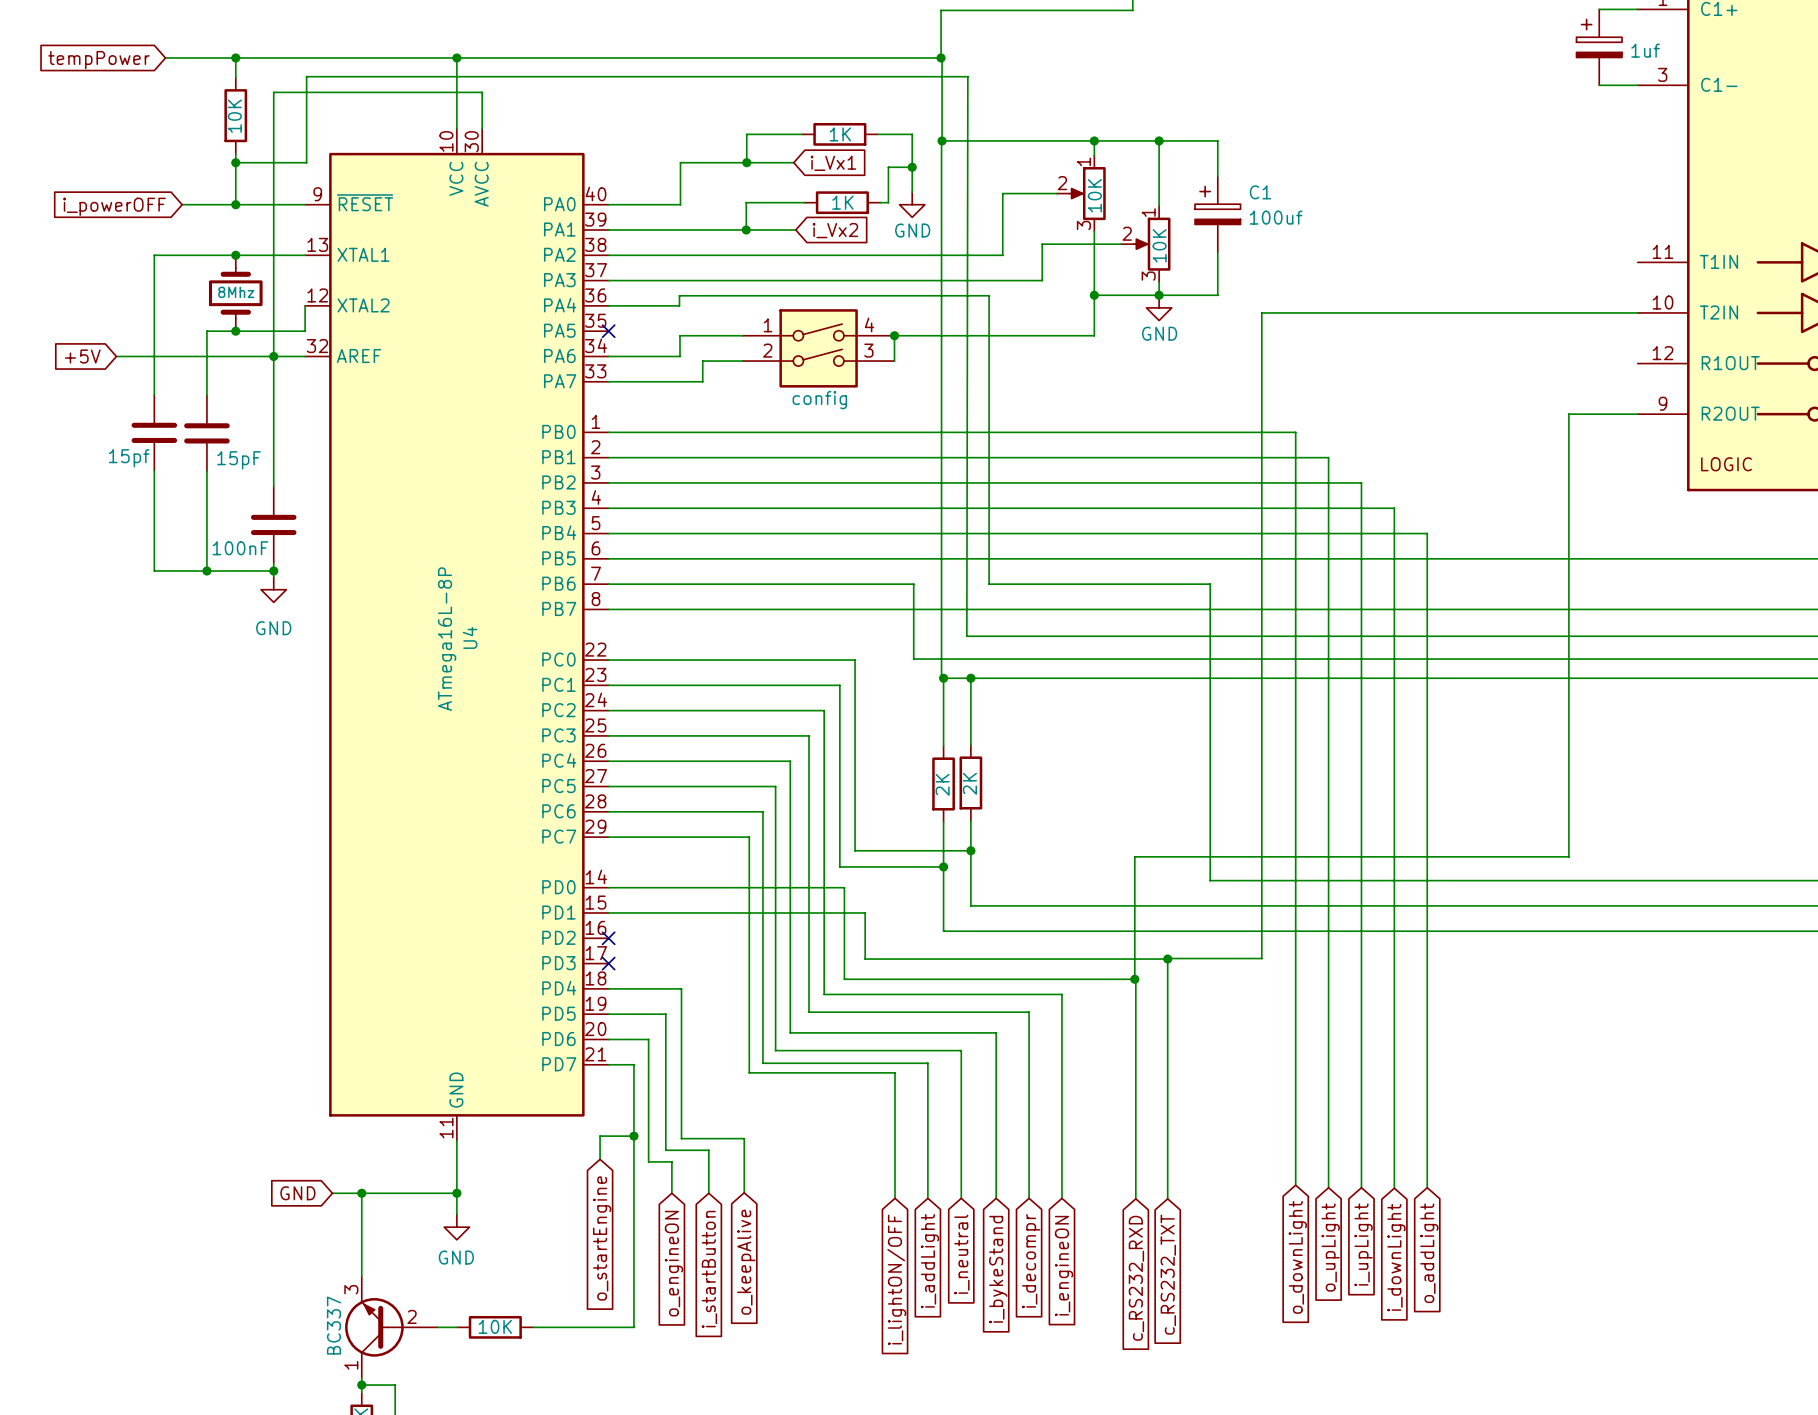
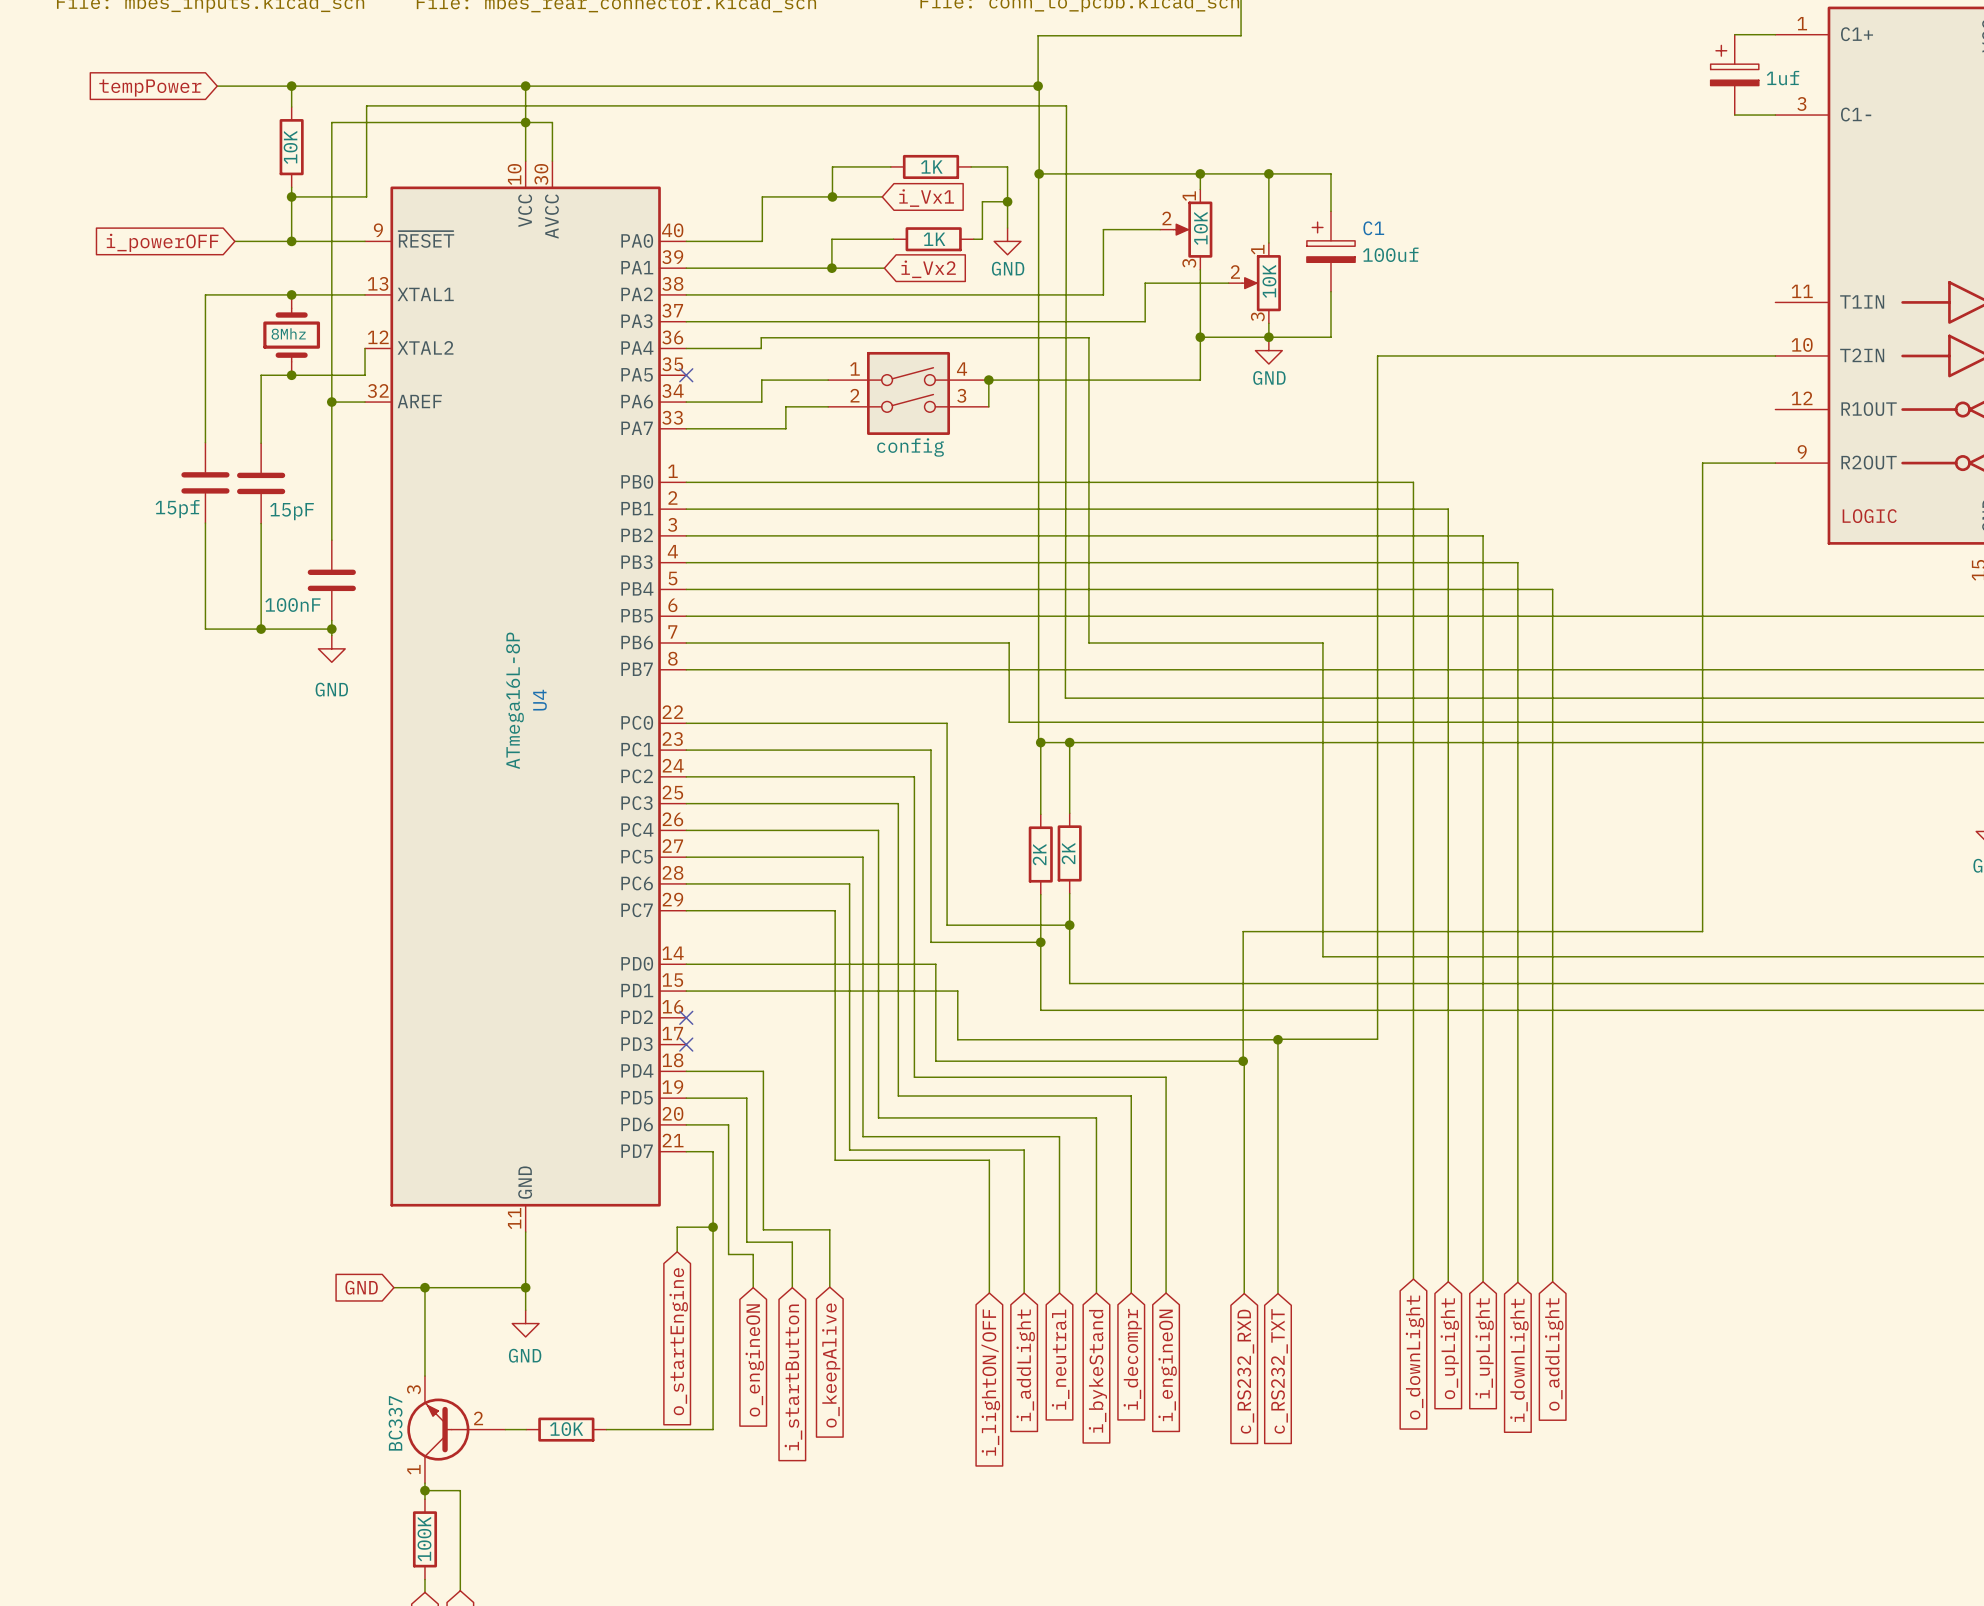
junction: none -> (525, 122)
global label: +5V (82, 356) -> none
wire: (116, 356) (273, 356) -> none

